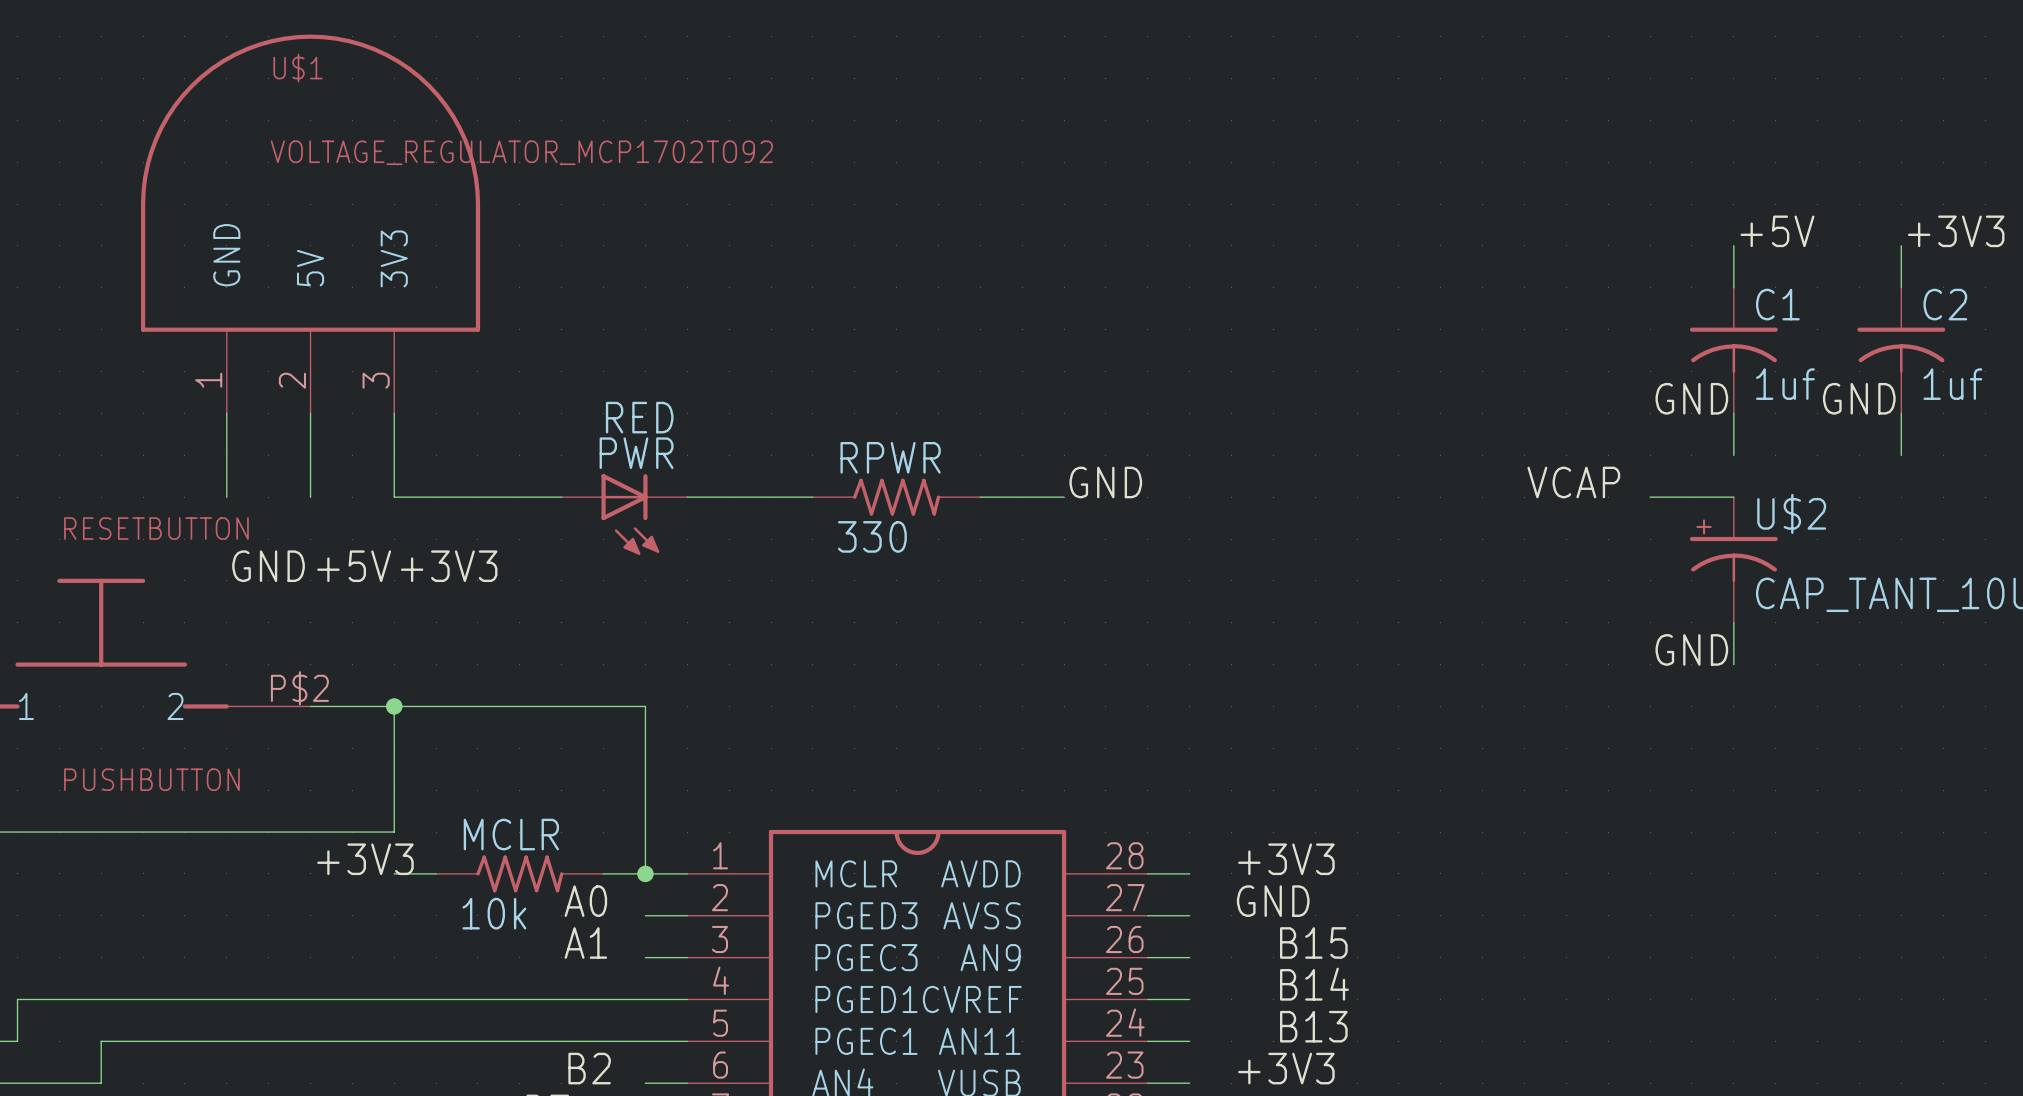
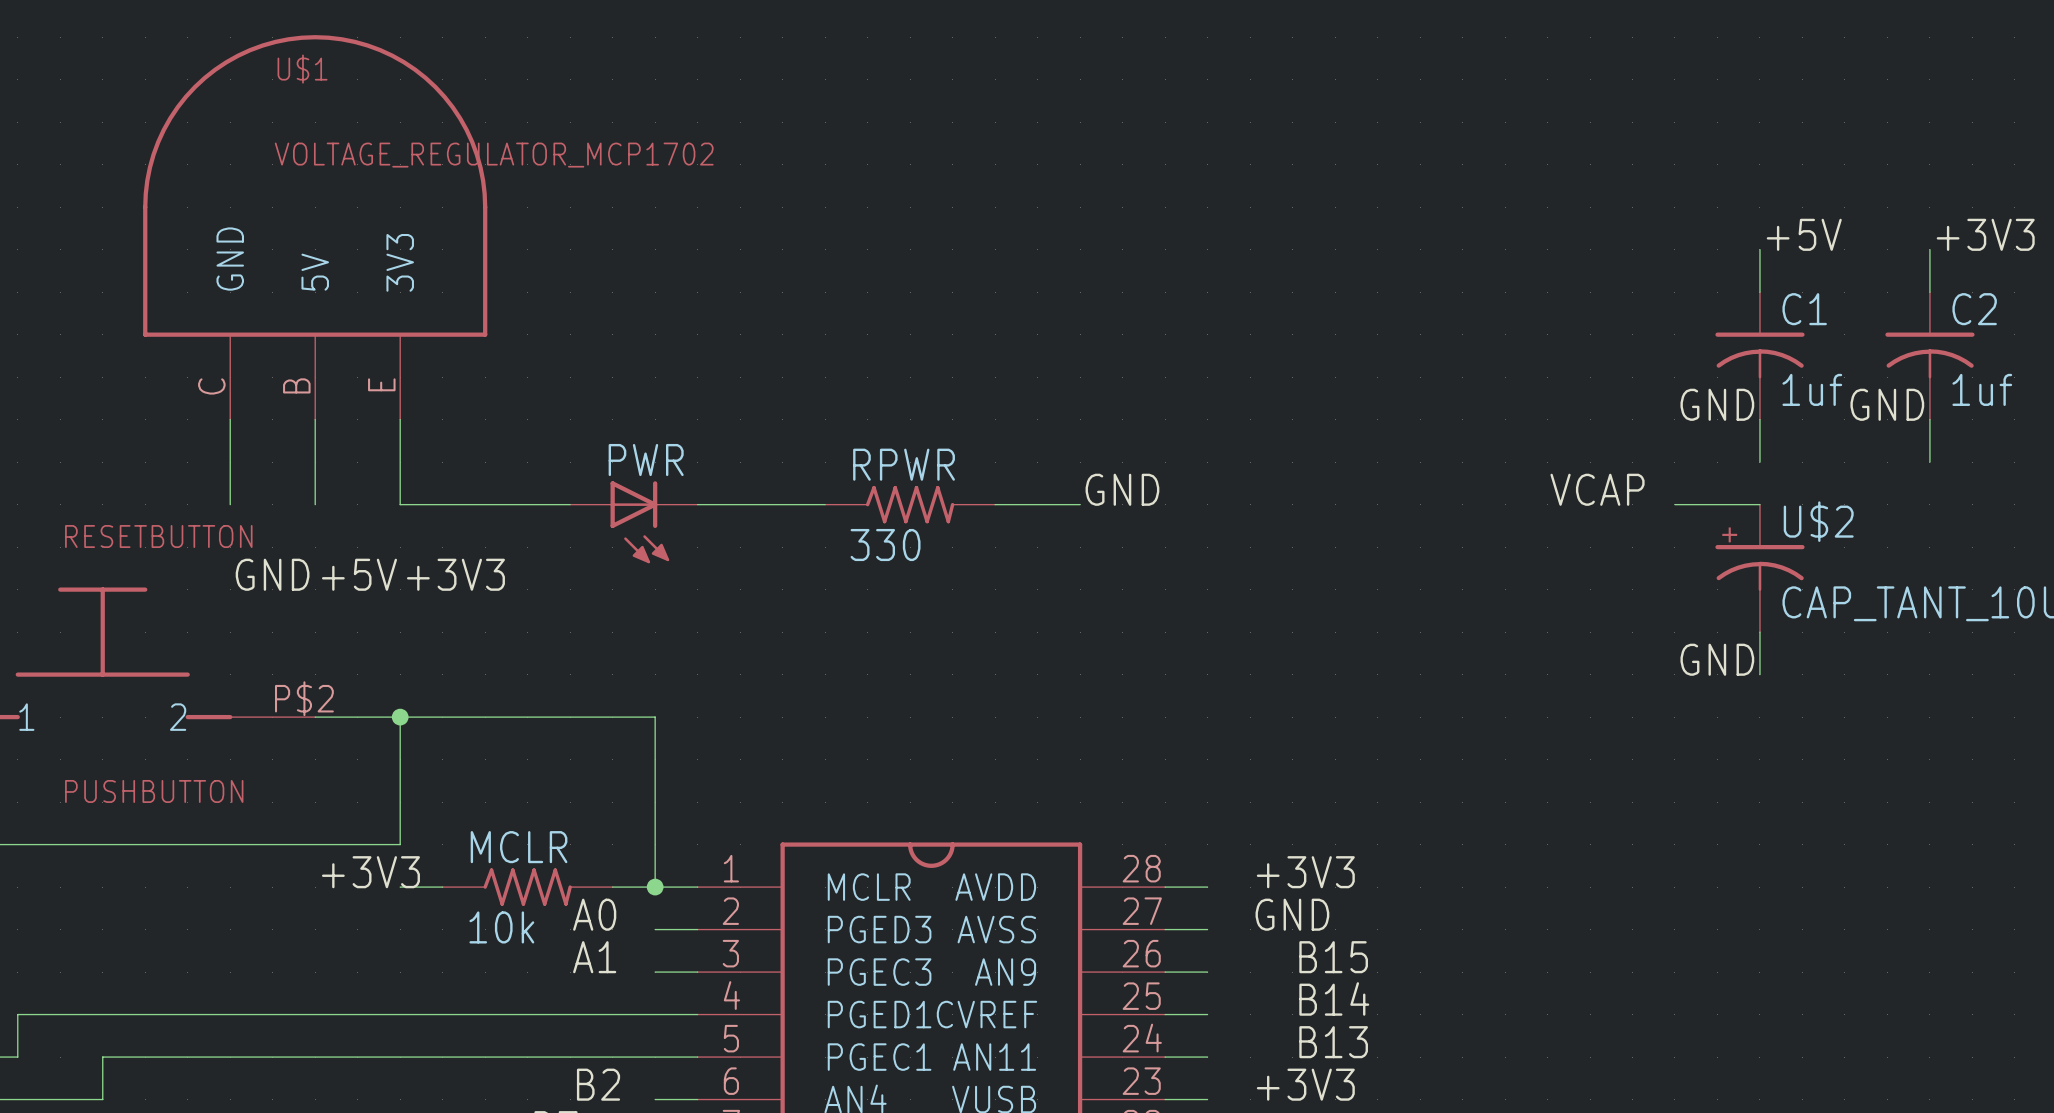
U$1 value: VOLTAGE_REGULATOR_MCP1702TO92 (521, 152) -> VOLTAGE_REGULATOR_MCP1702 (494, 155)
U$1 pin number: 1 (208, 380) -> C (211, 386)
U$1 pin number: 2 (292, 380) -> B (296, 385)
U$1 pin number: 3 (376, 380) -> E (381, 384)
PWR value: RED (639, 417) -> none

